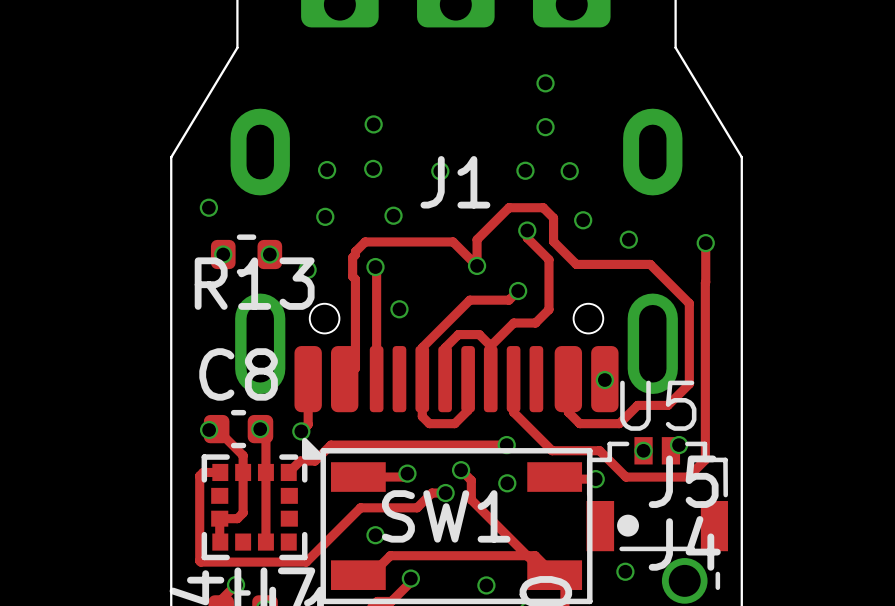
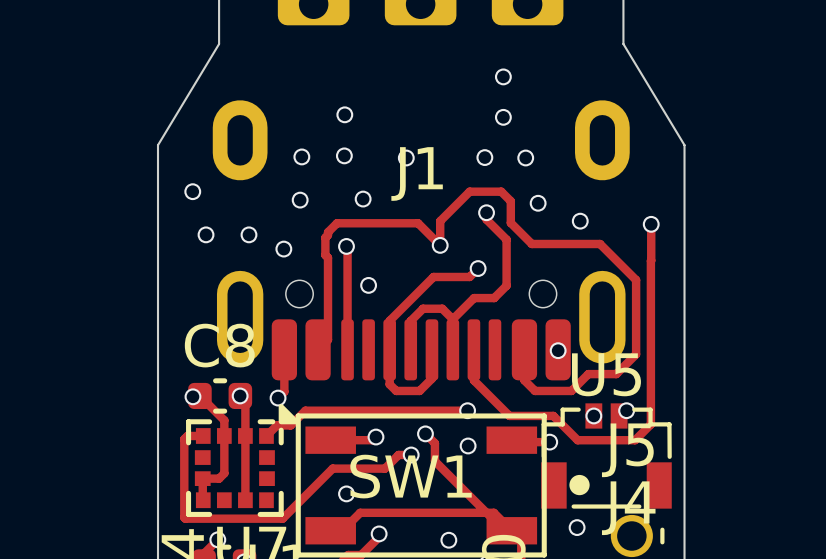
R13: (246, 254) -> none

